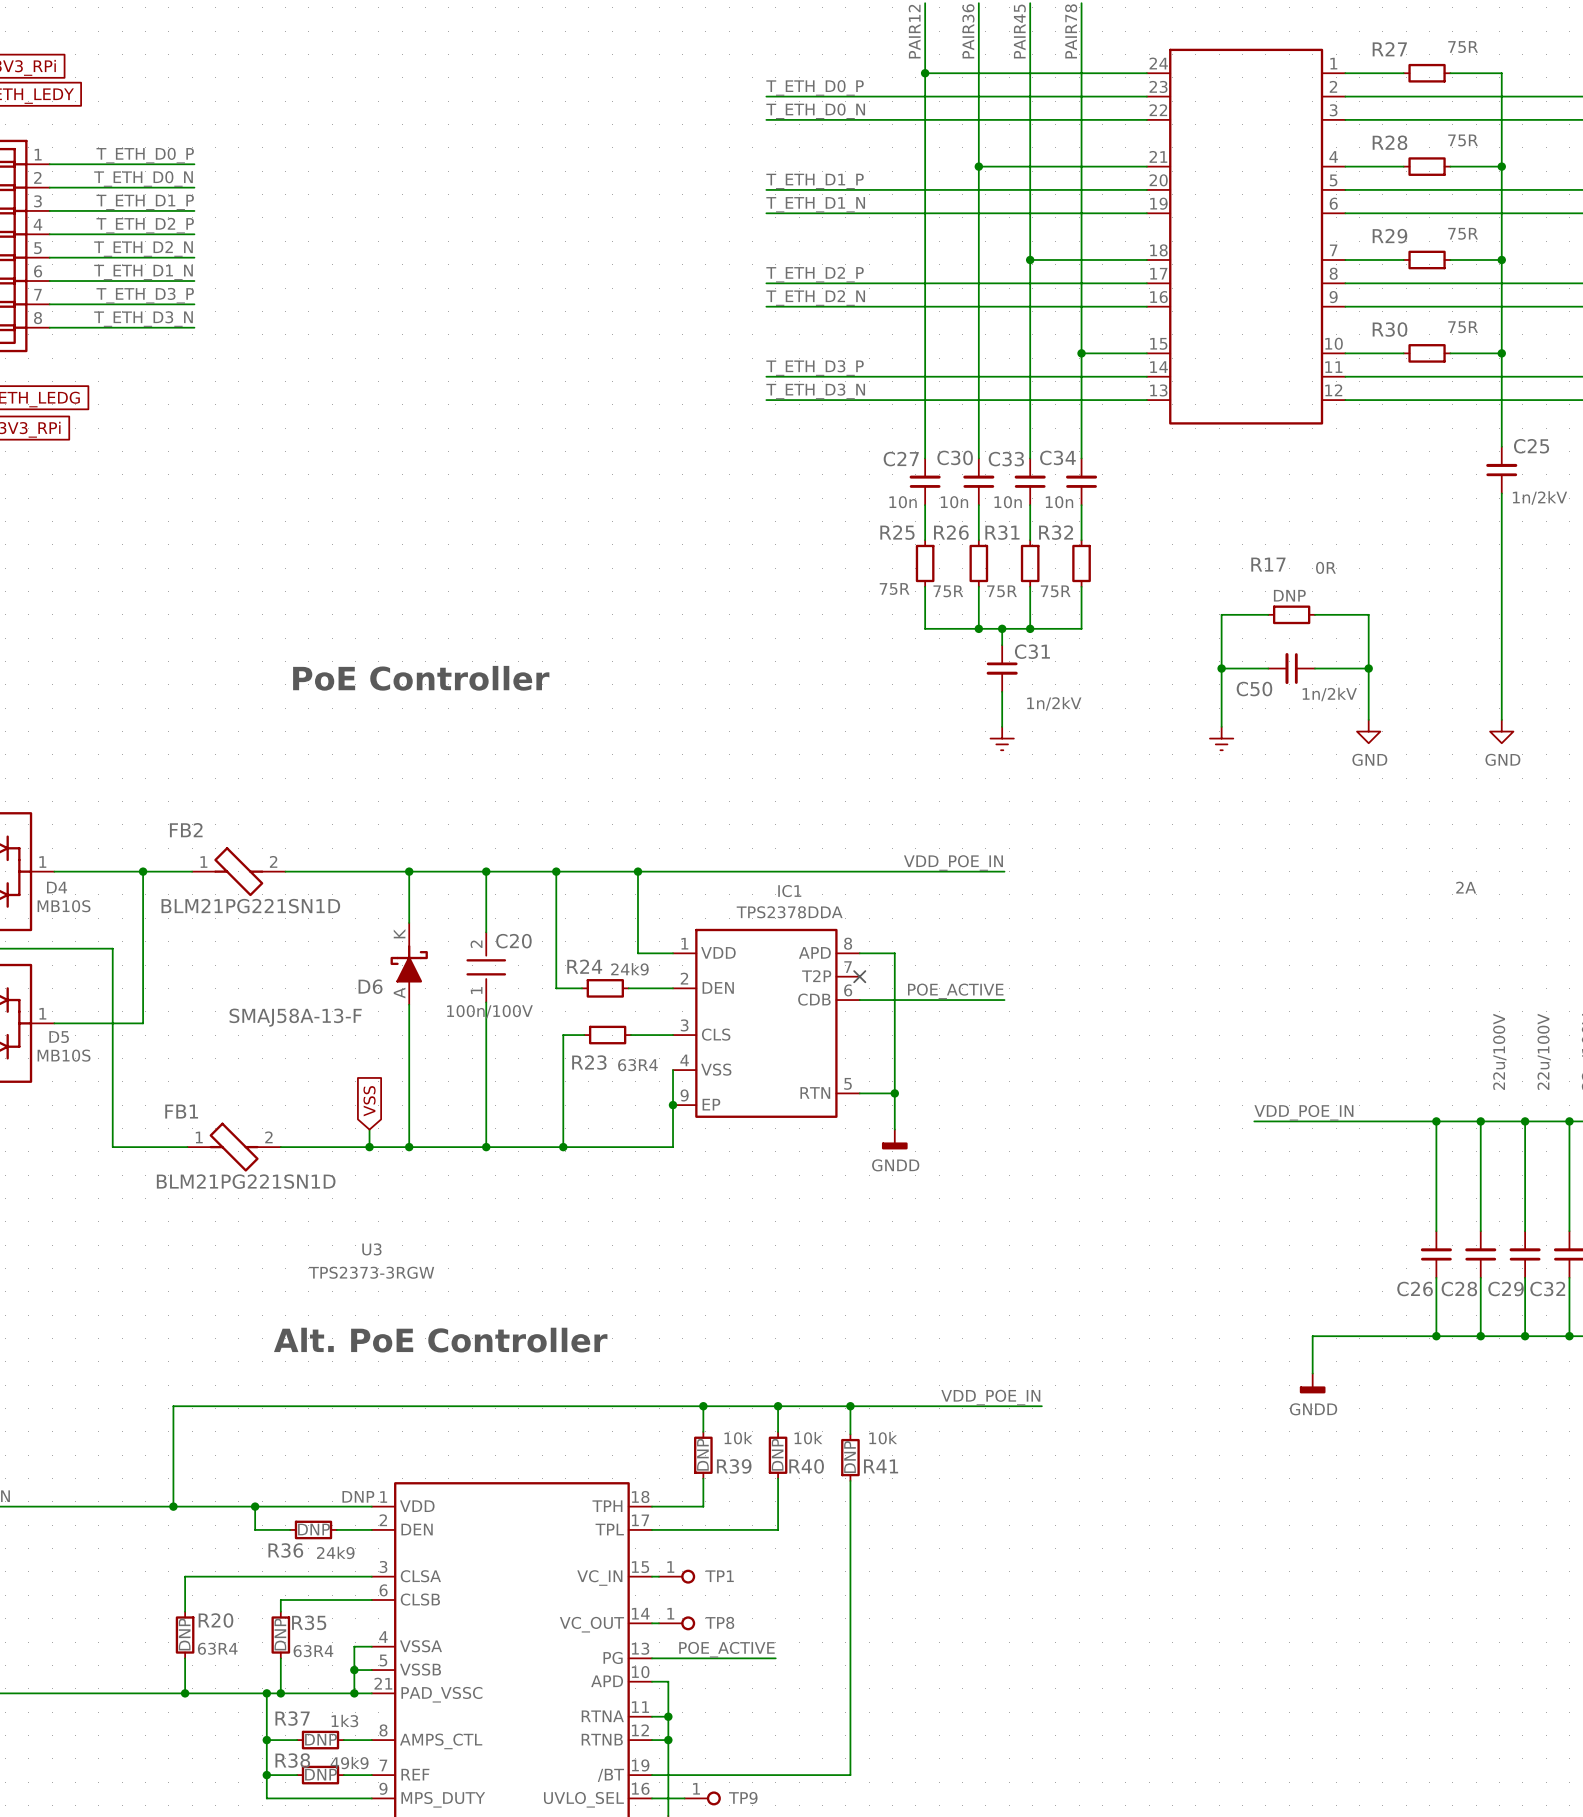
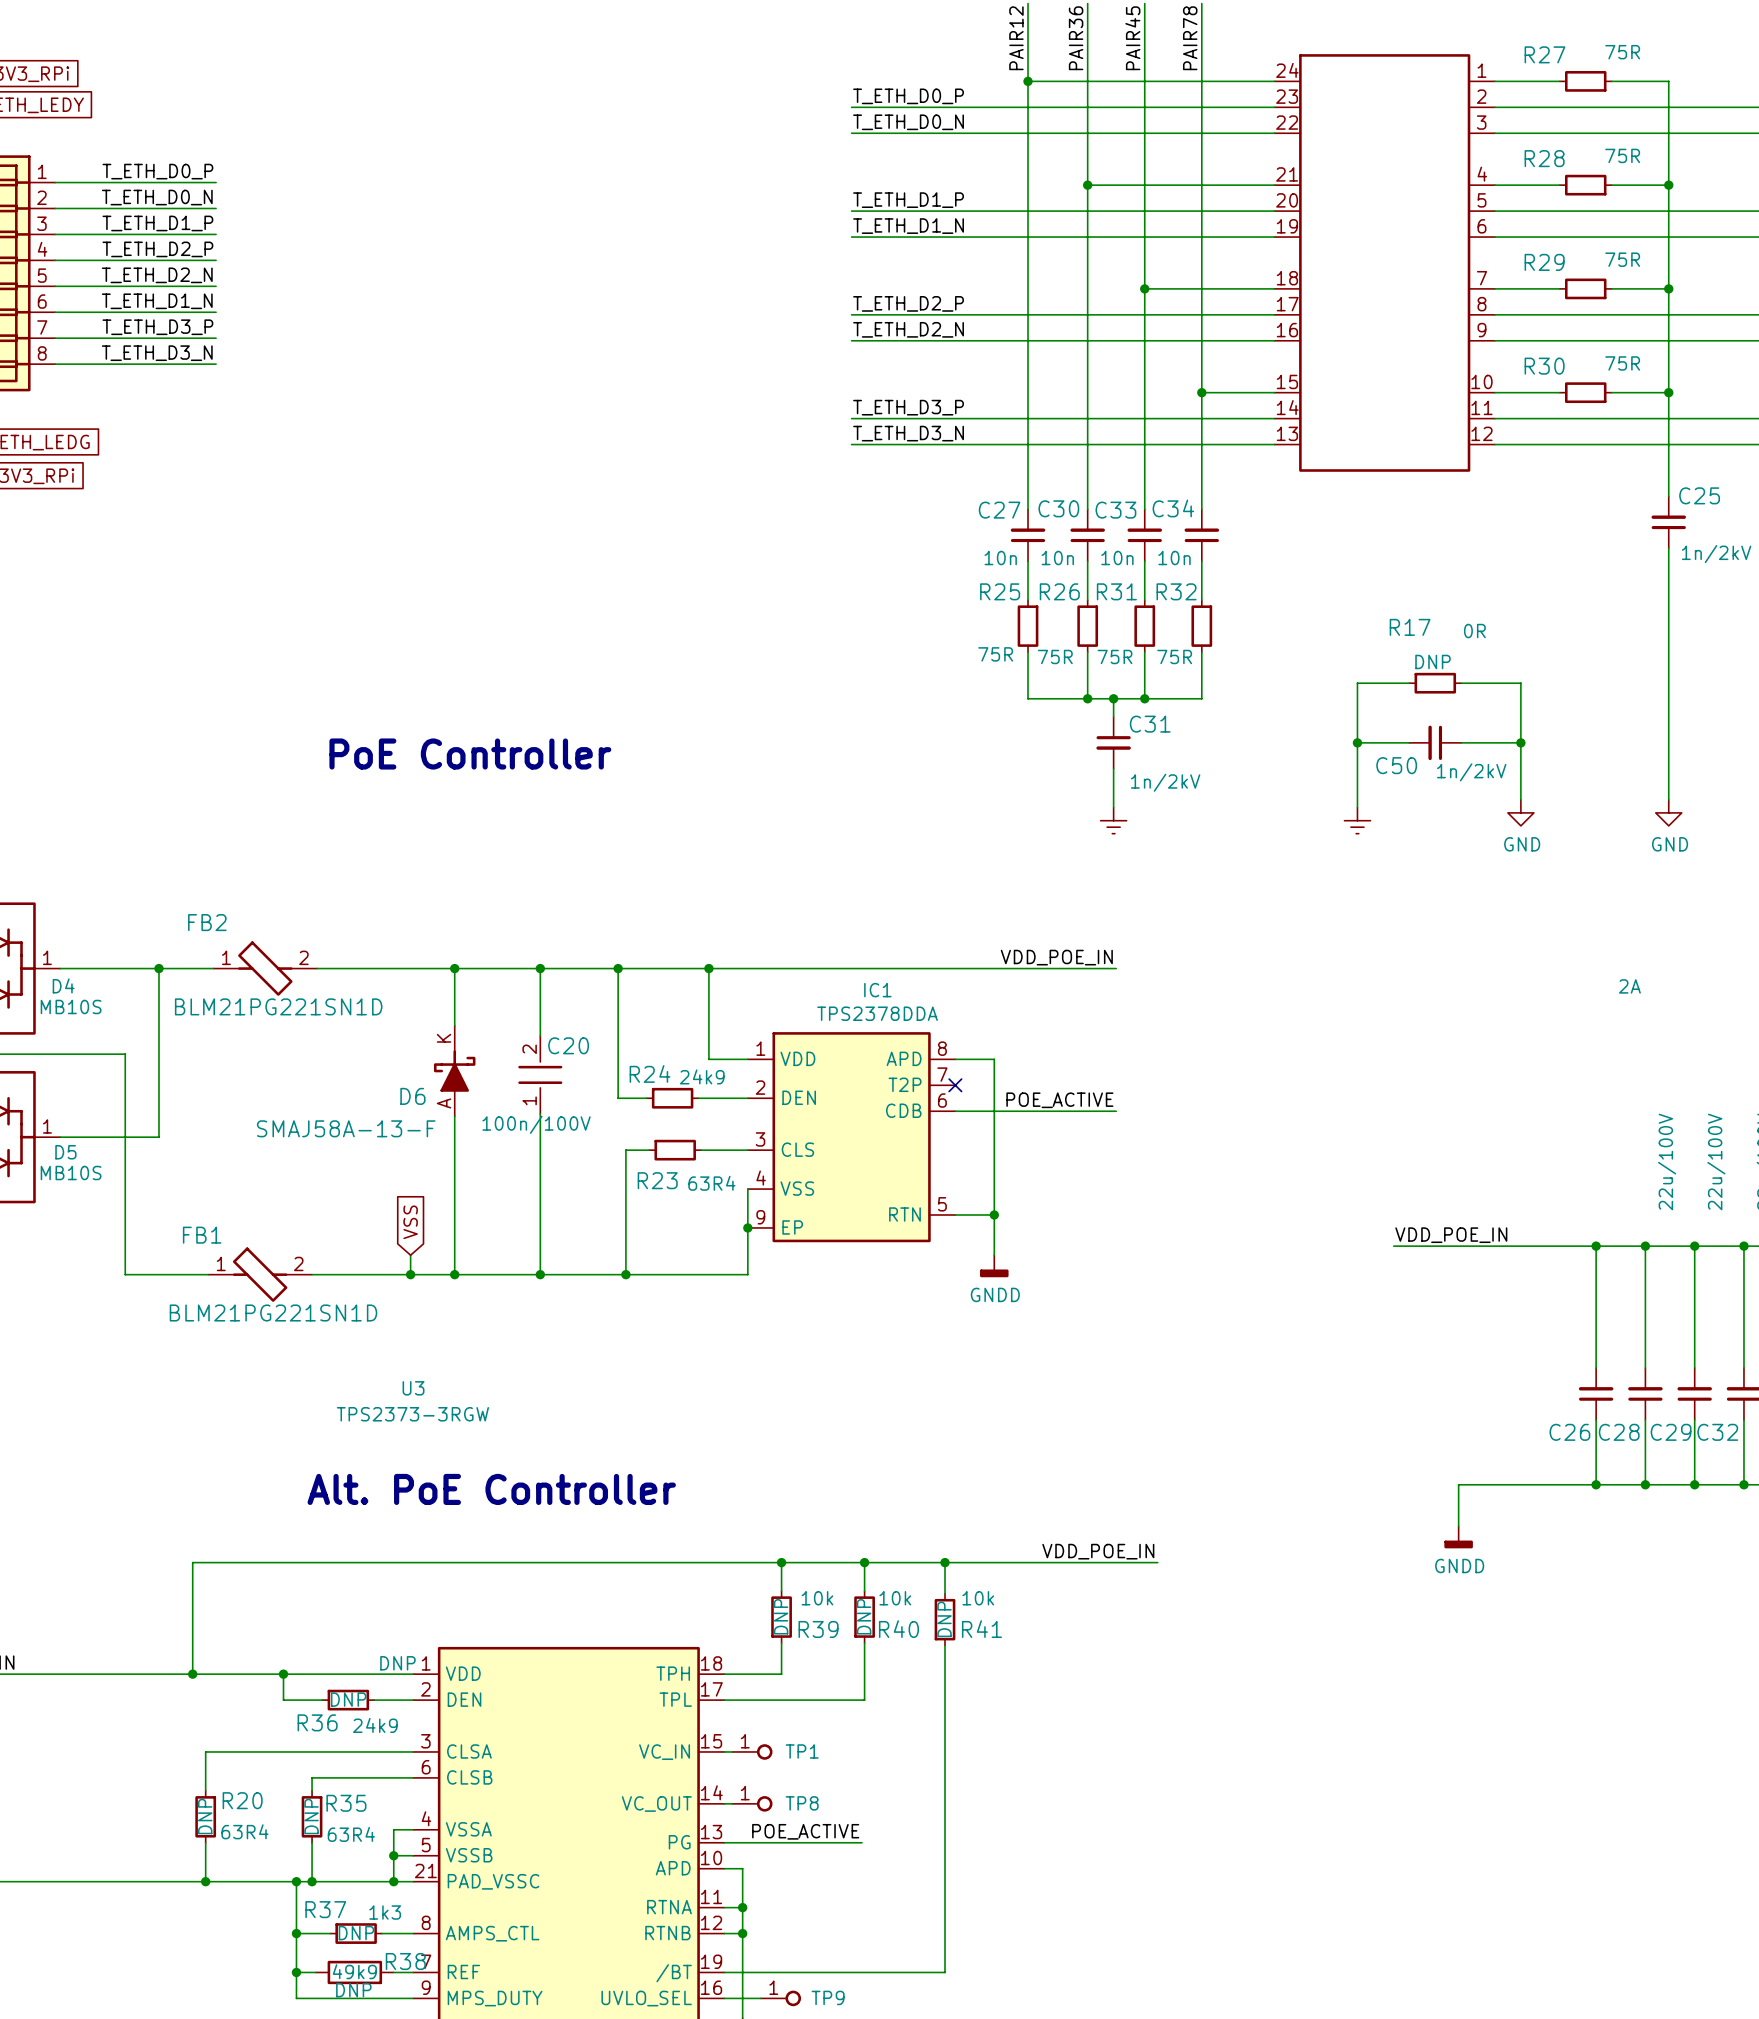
R38 name position: R38 (292, 1760) -> R38 (405, 1961)
R38 text position: 49k9 (349, 1763) -> 49k9 (354, 1971)
R38 symbol: [297, 1765, 344, 1785] -> [315, 1960, 394, 1985]

